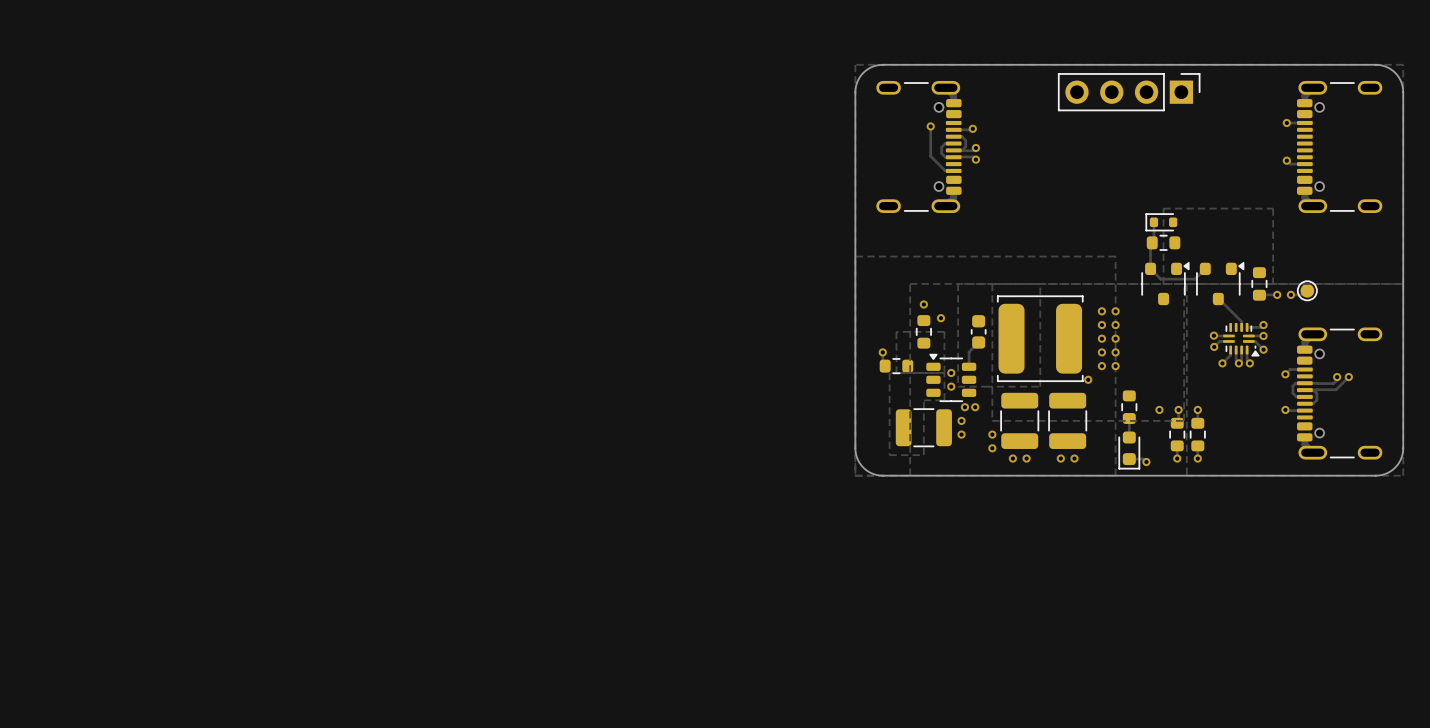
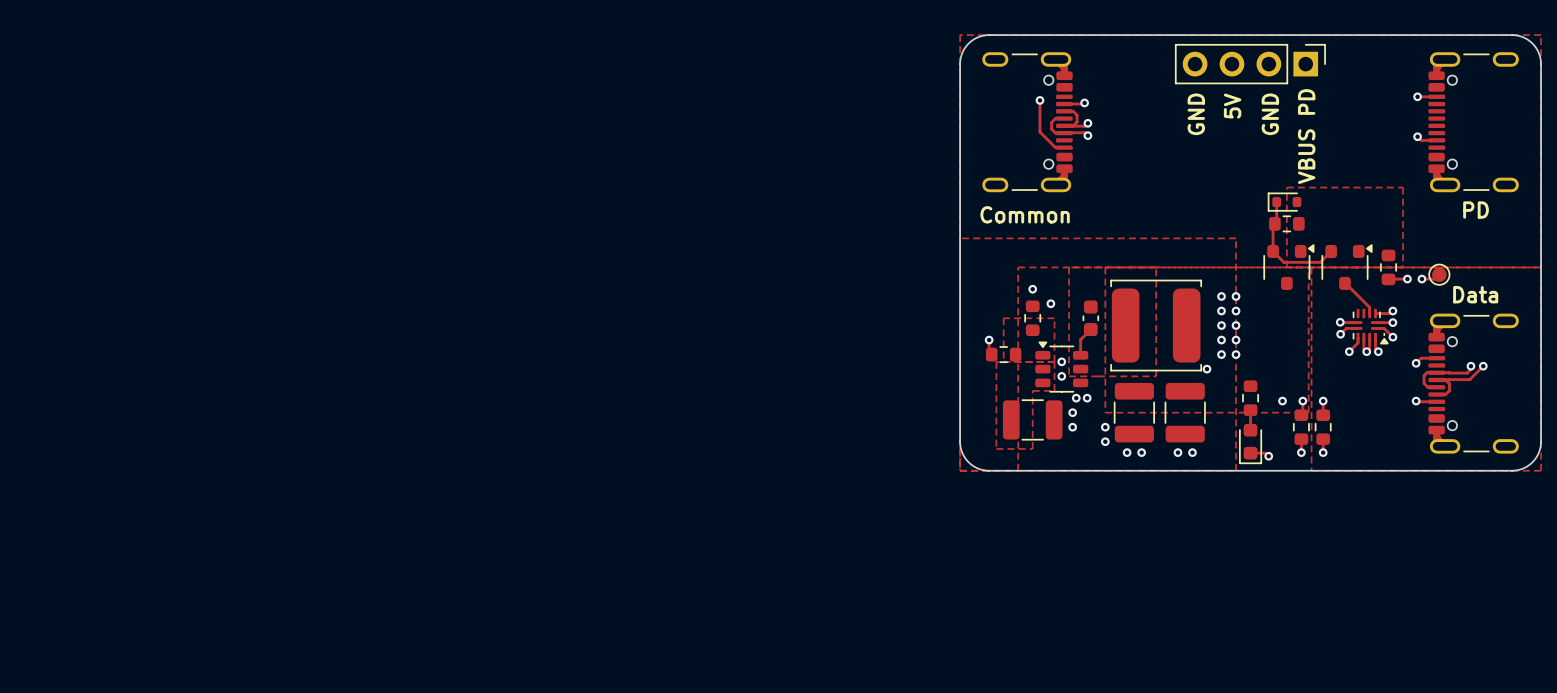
text: none -> 5V (1232, 106)
text: none -> GND (1196, 114)
text: none -> GND (1270, 114)
text: none -> VBUS PD (1306, 136)
text: none -> PD (1476, 210)
text: none -> Common (1025, 214)
text: none -> Data (1475, 294)

